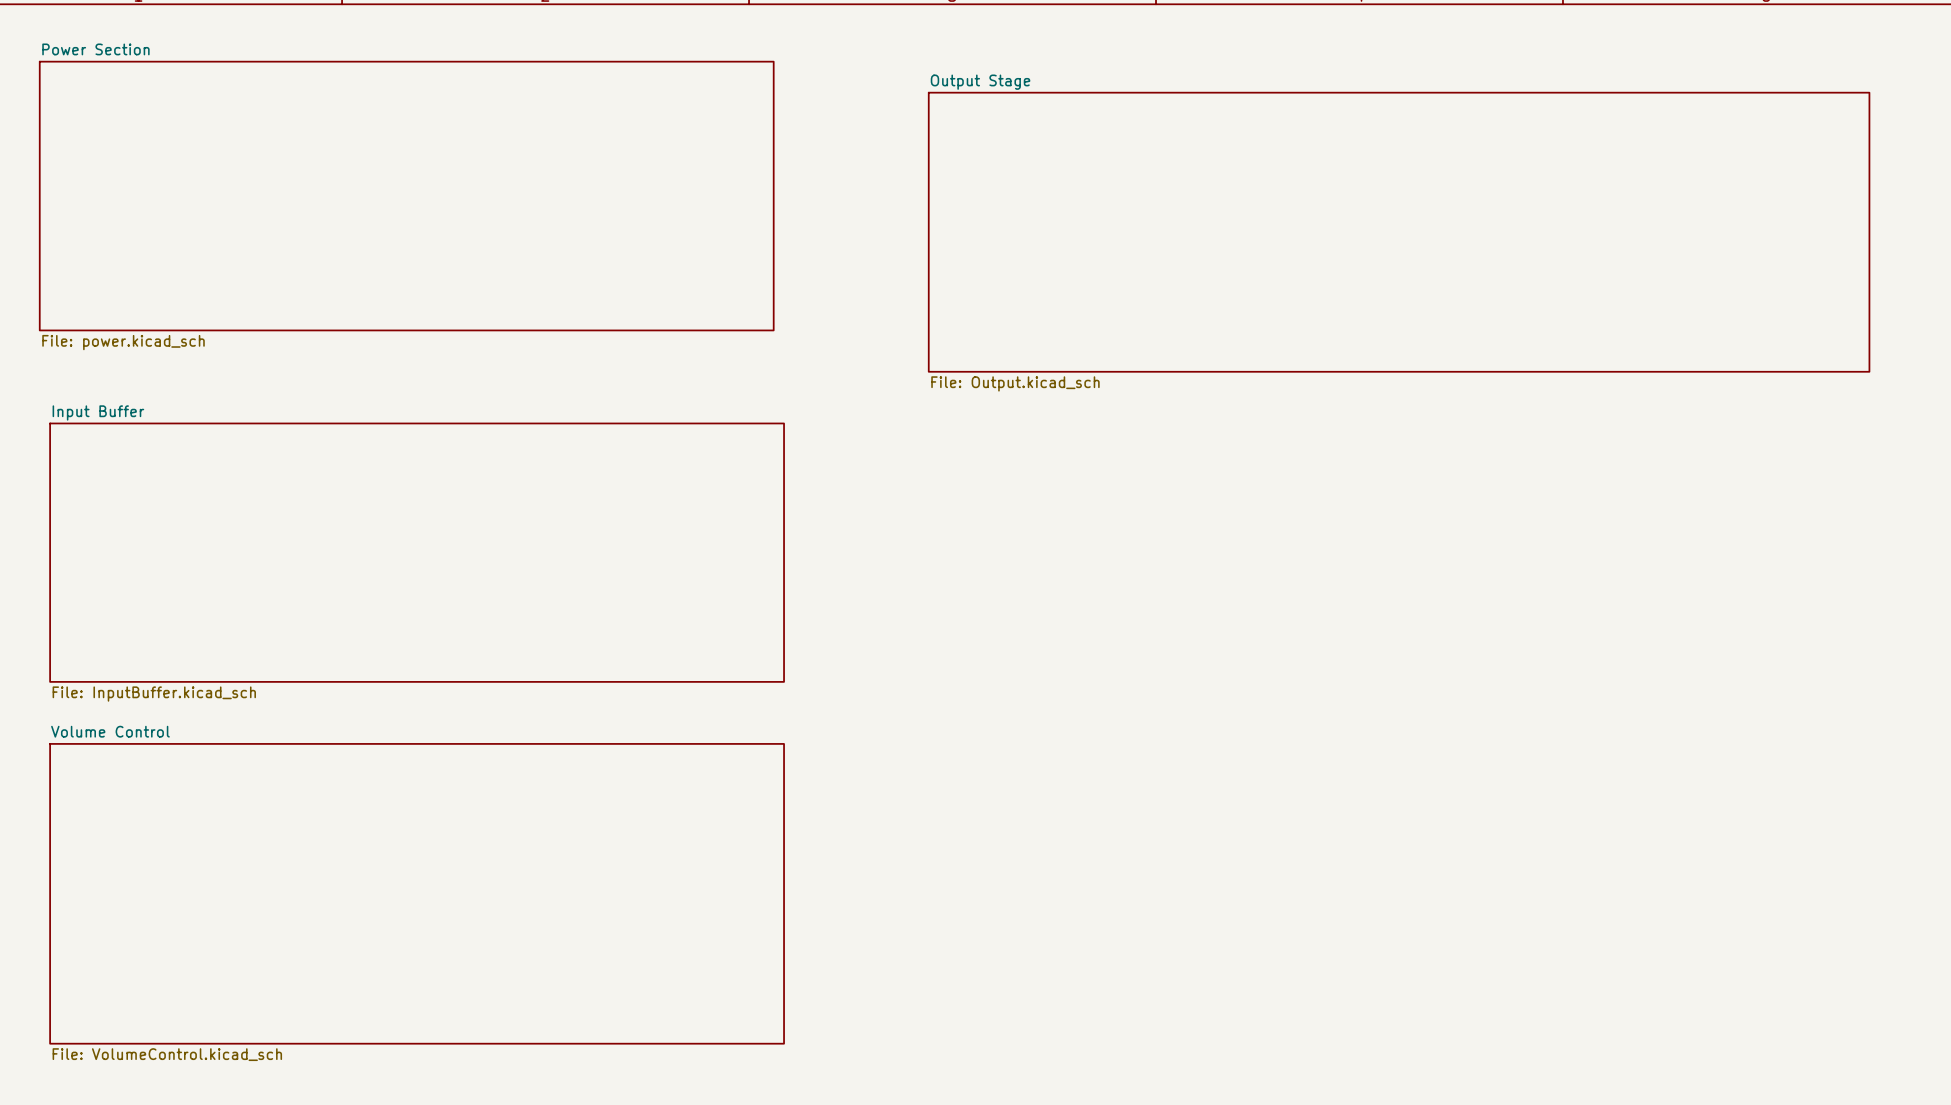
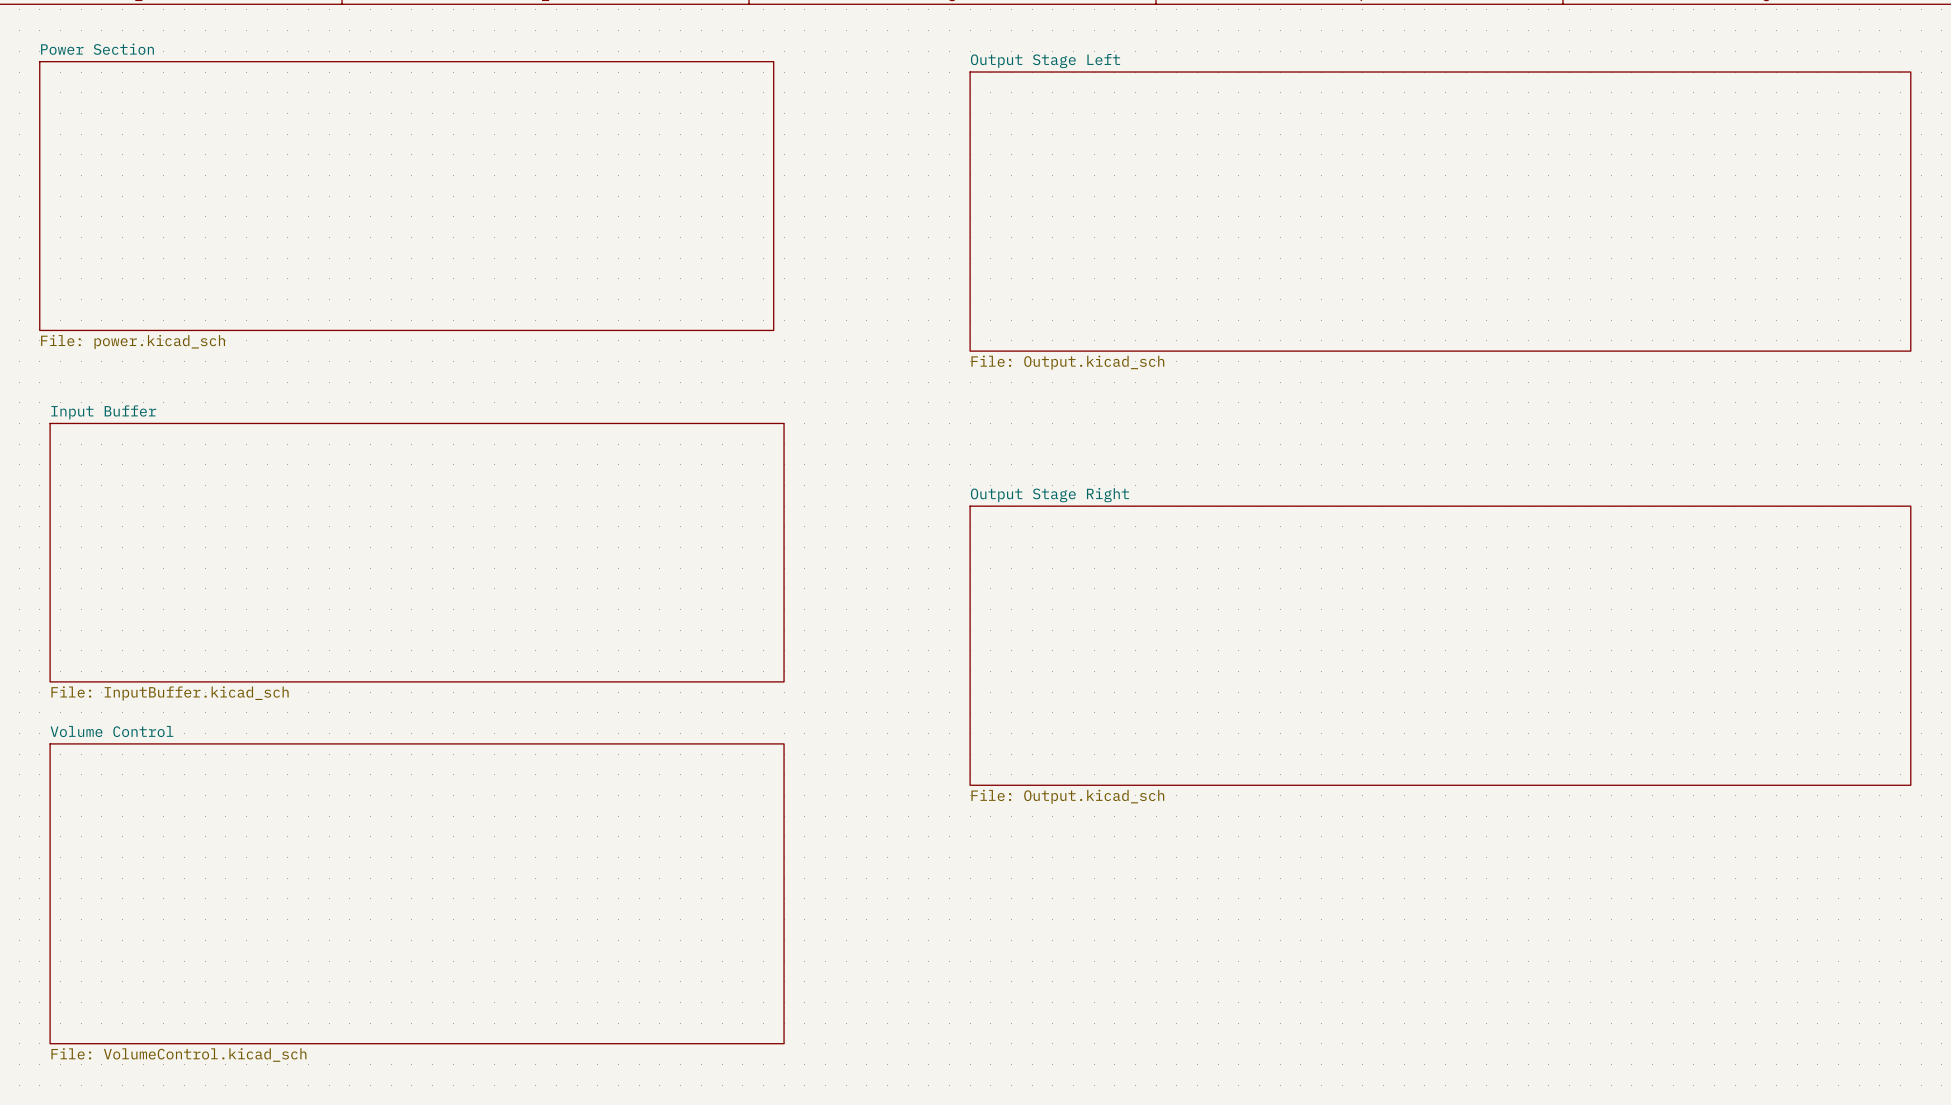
sheet Output Stage Left: none -> File: Output.kicad_sch (1440, 211)
sheet Output Stage: File: Output.kicad_sch (1399, 232) -> none
sheet Output Stage Right: none -> File: Output.kicad_sch (1440, 645)

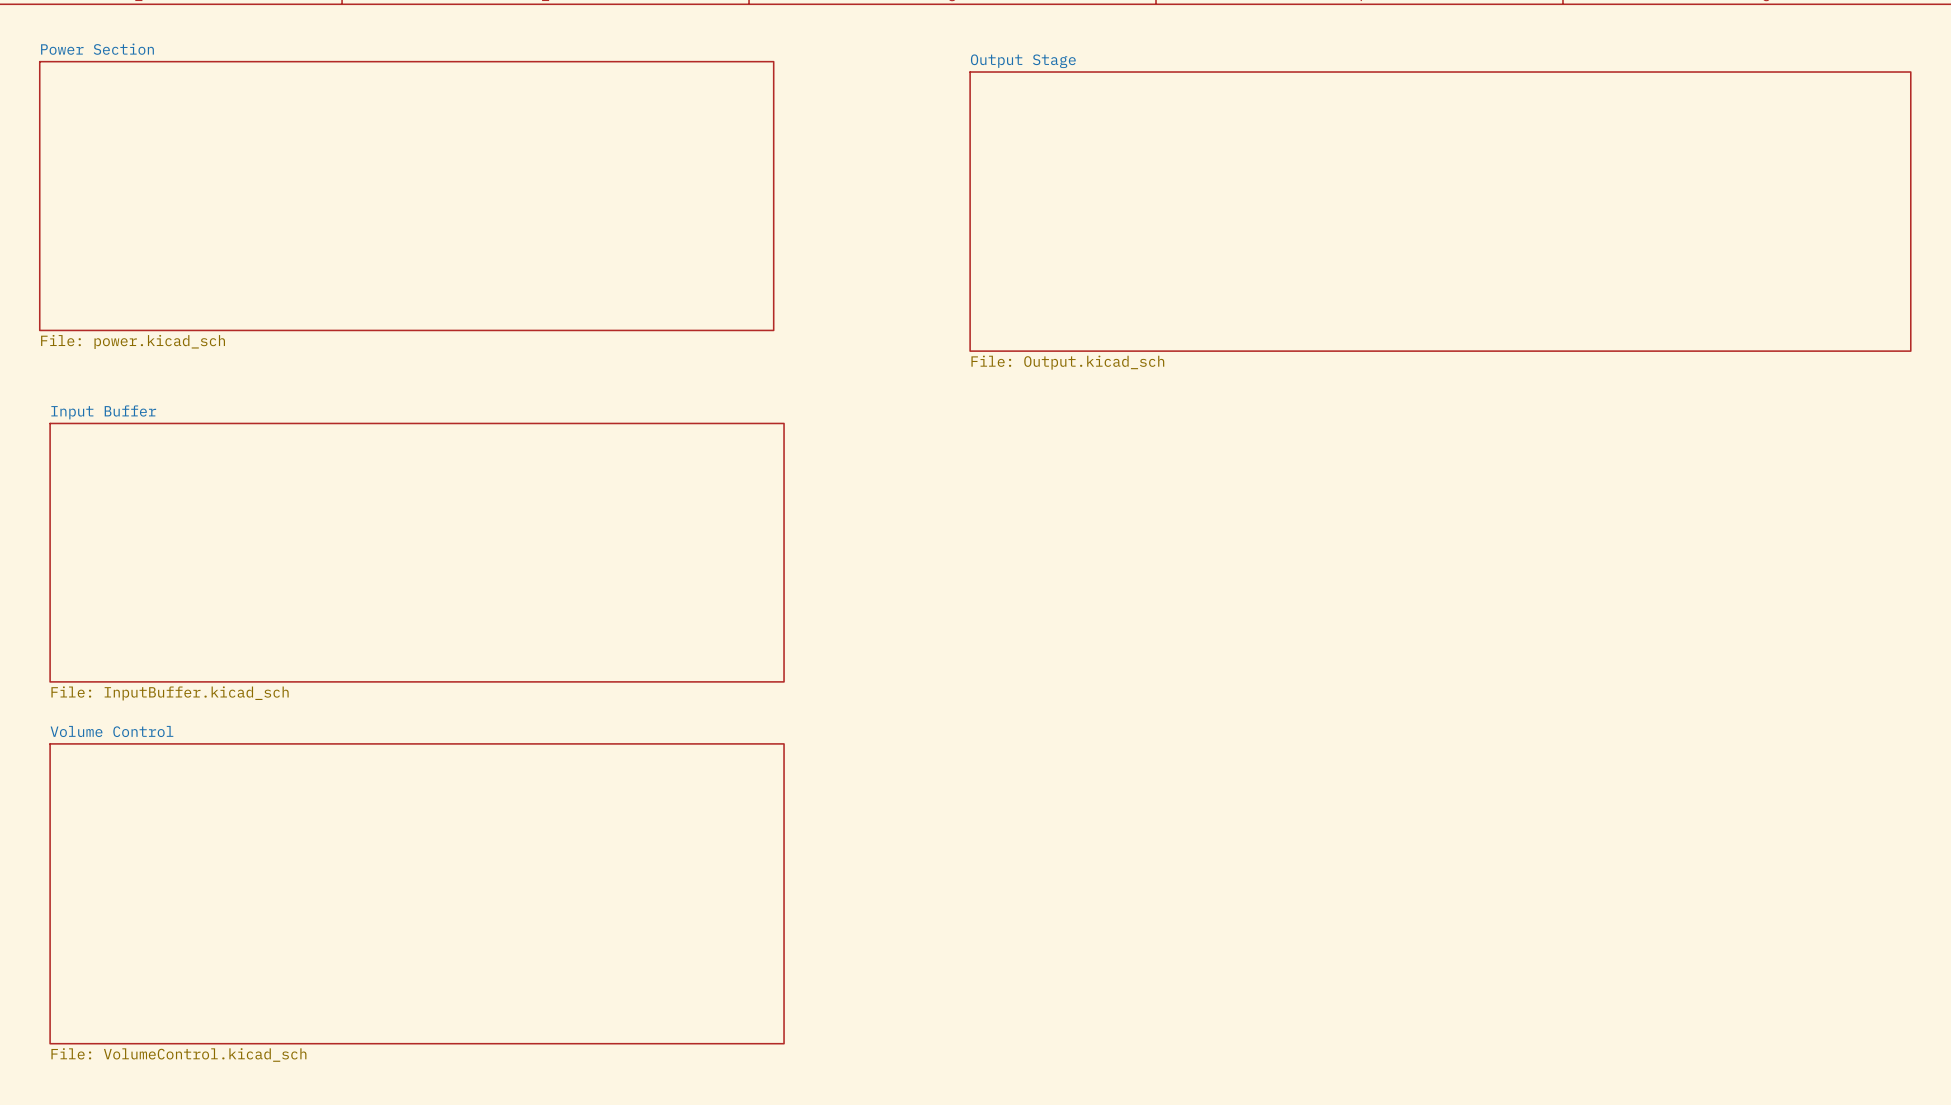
sheet Output Stage Left name: Output Stage Left (1045, 61) -> Output Stage (1023, 61)
sheet Output Stage Right: File: Output.kicad_sch (1440, 645) -> none

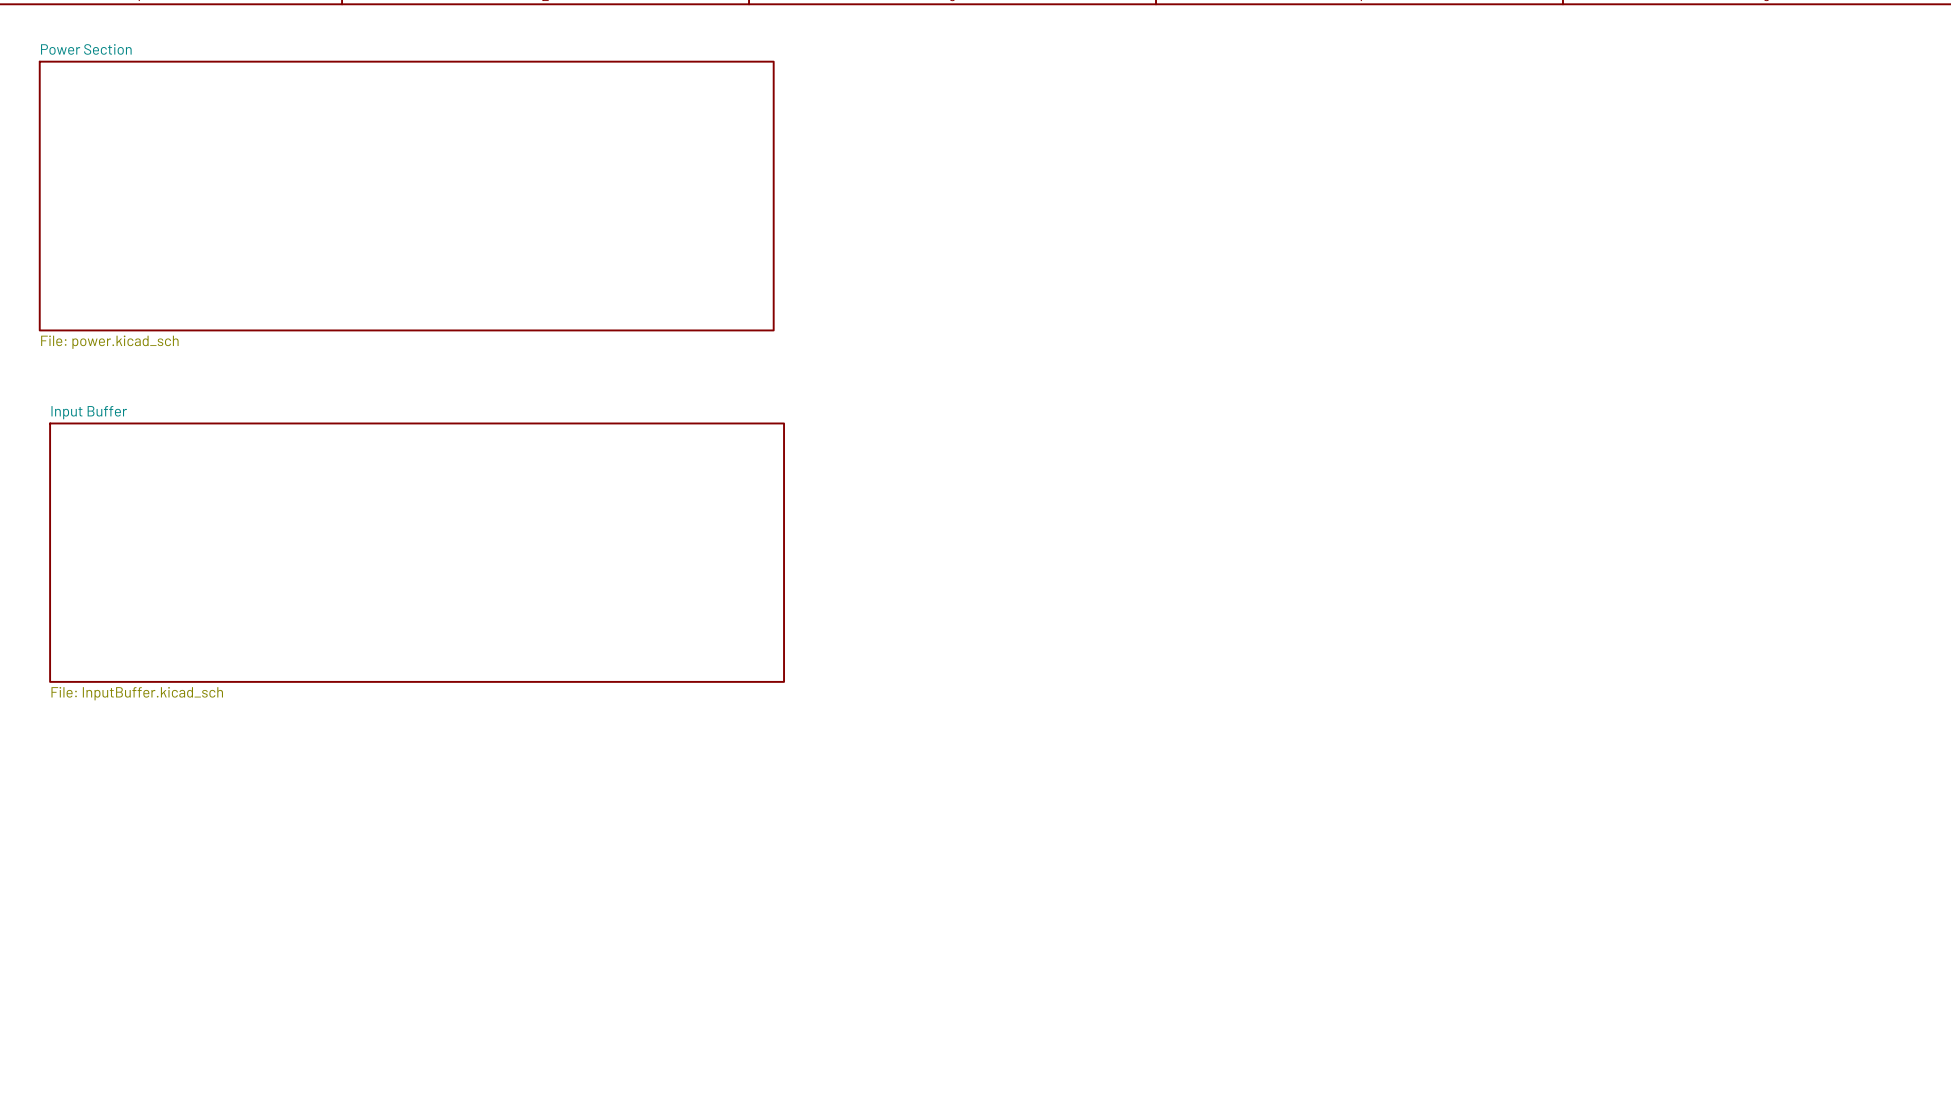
sheet Output Stage: File: Output.kicad_sch (1440, 211) -> none
sheet Volume Control: File: VolumeControl.kicad_sch (417, 893) -> none

